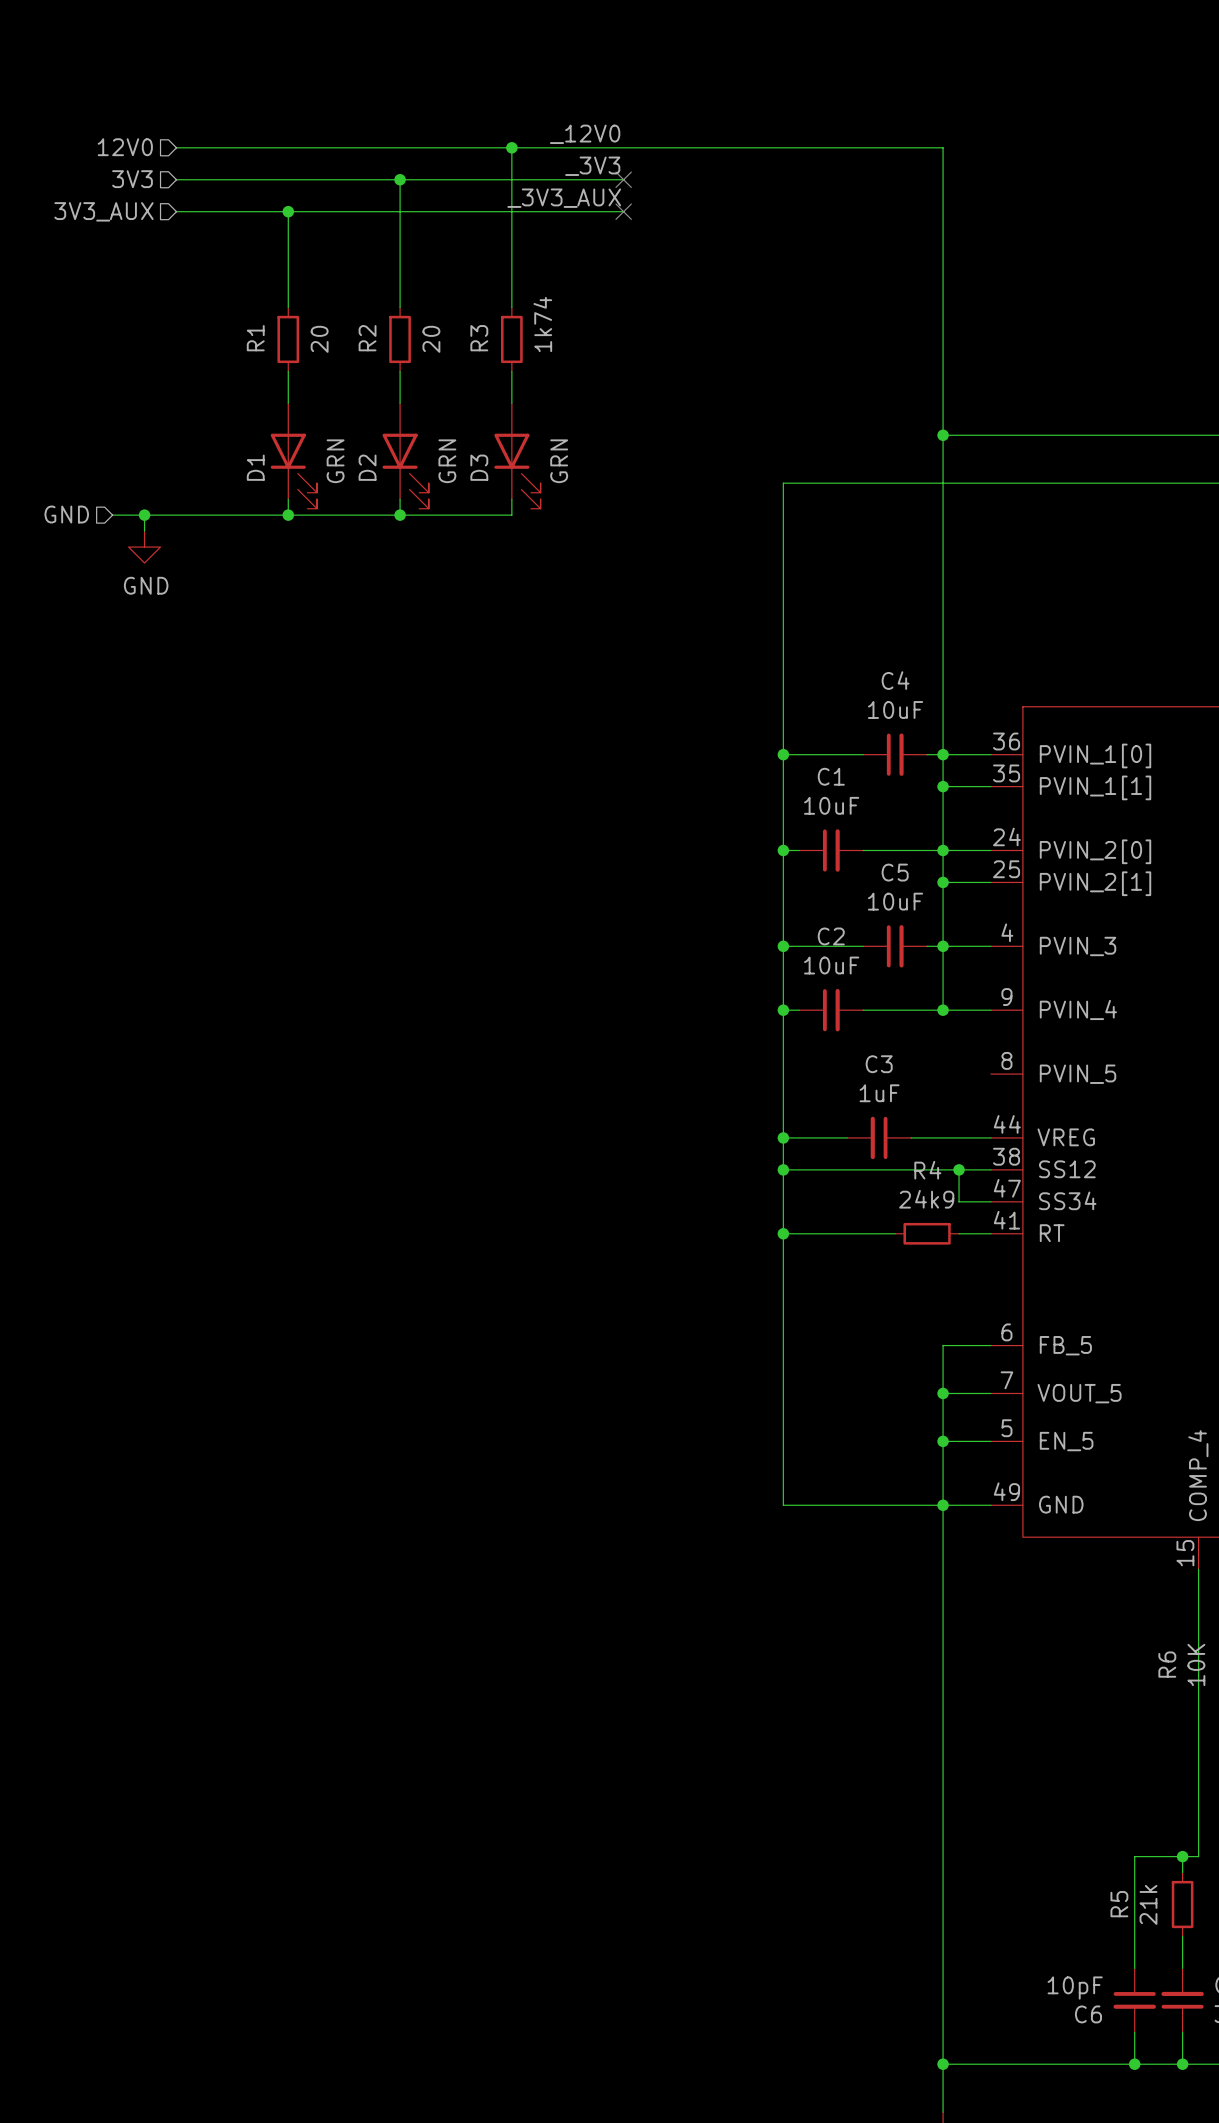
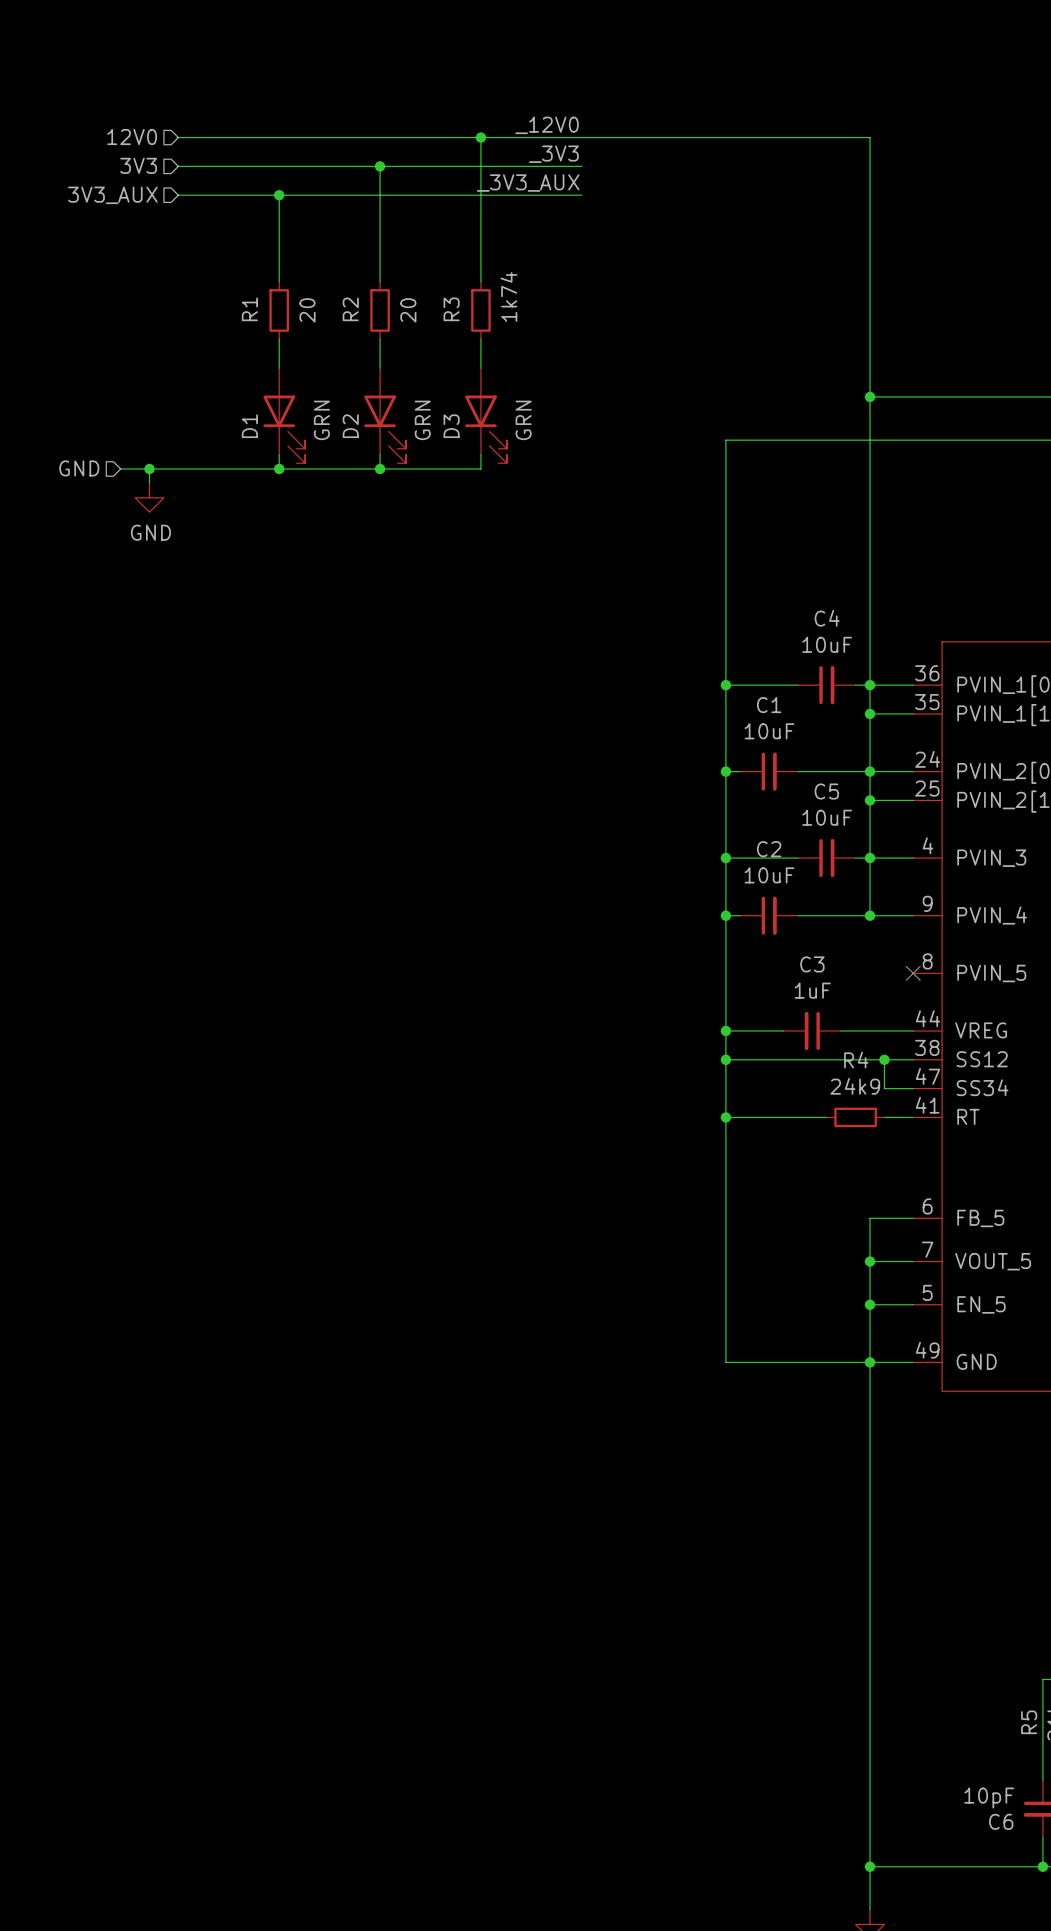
no-connect mark: (623, 179) -> none
no-connect mark: (623, 211) -> none
no-connect mark: none -> (913, 973)

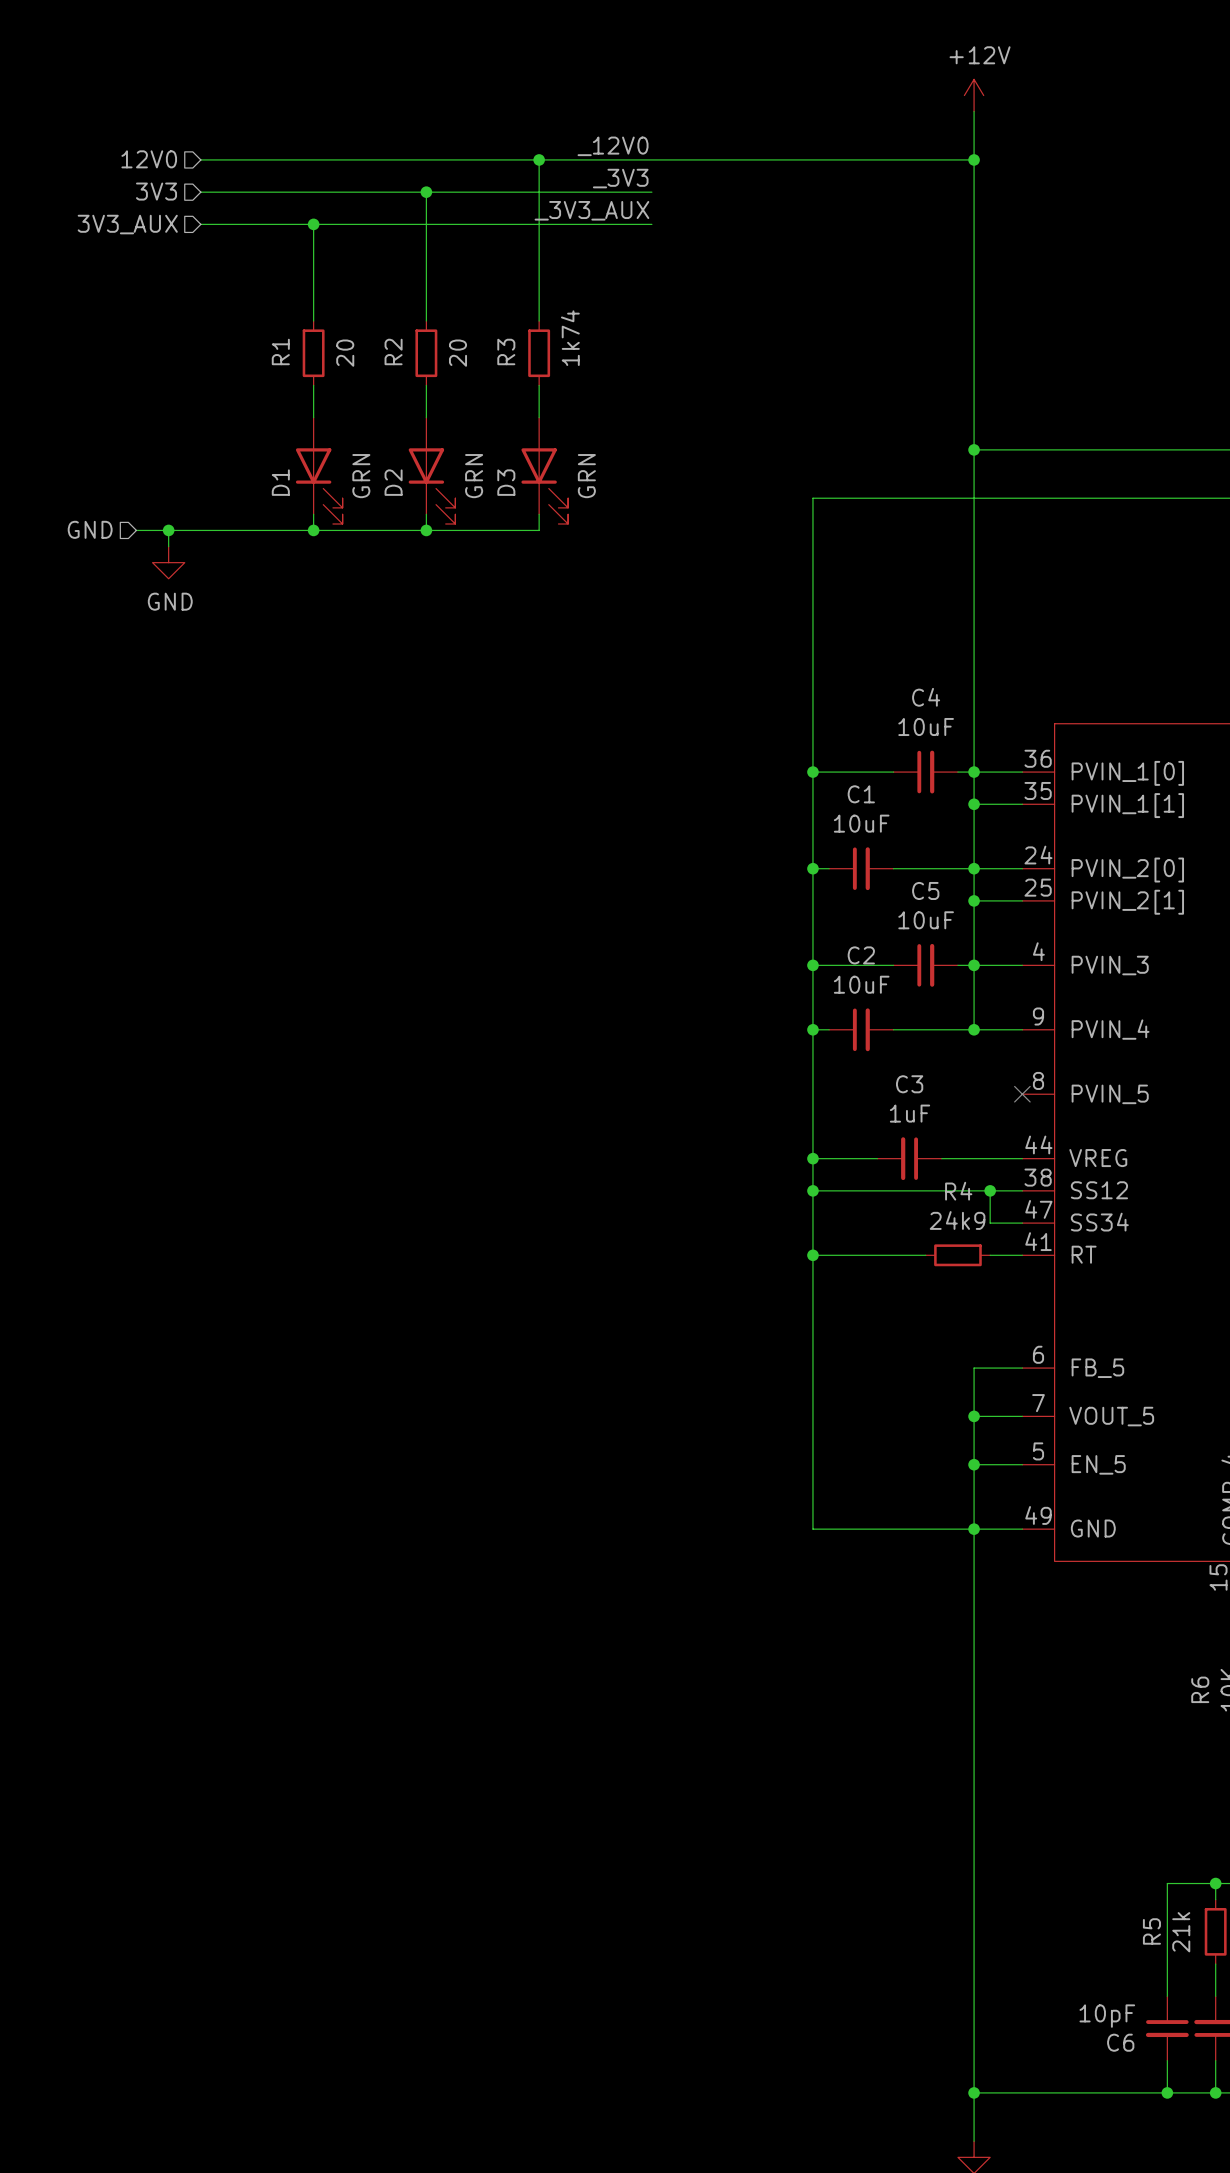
power symbol: none -> +12V (974, 95)
wire: none -> (974, 111) (974, 159)
junction: none -> (974, 159)

